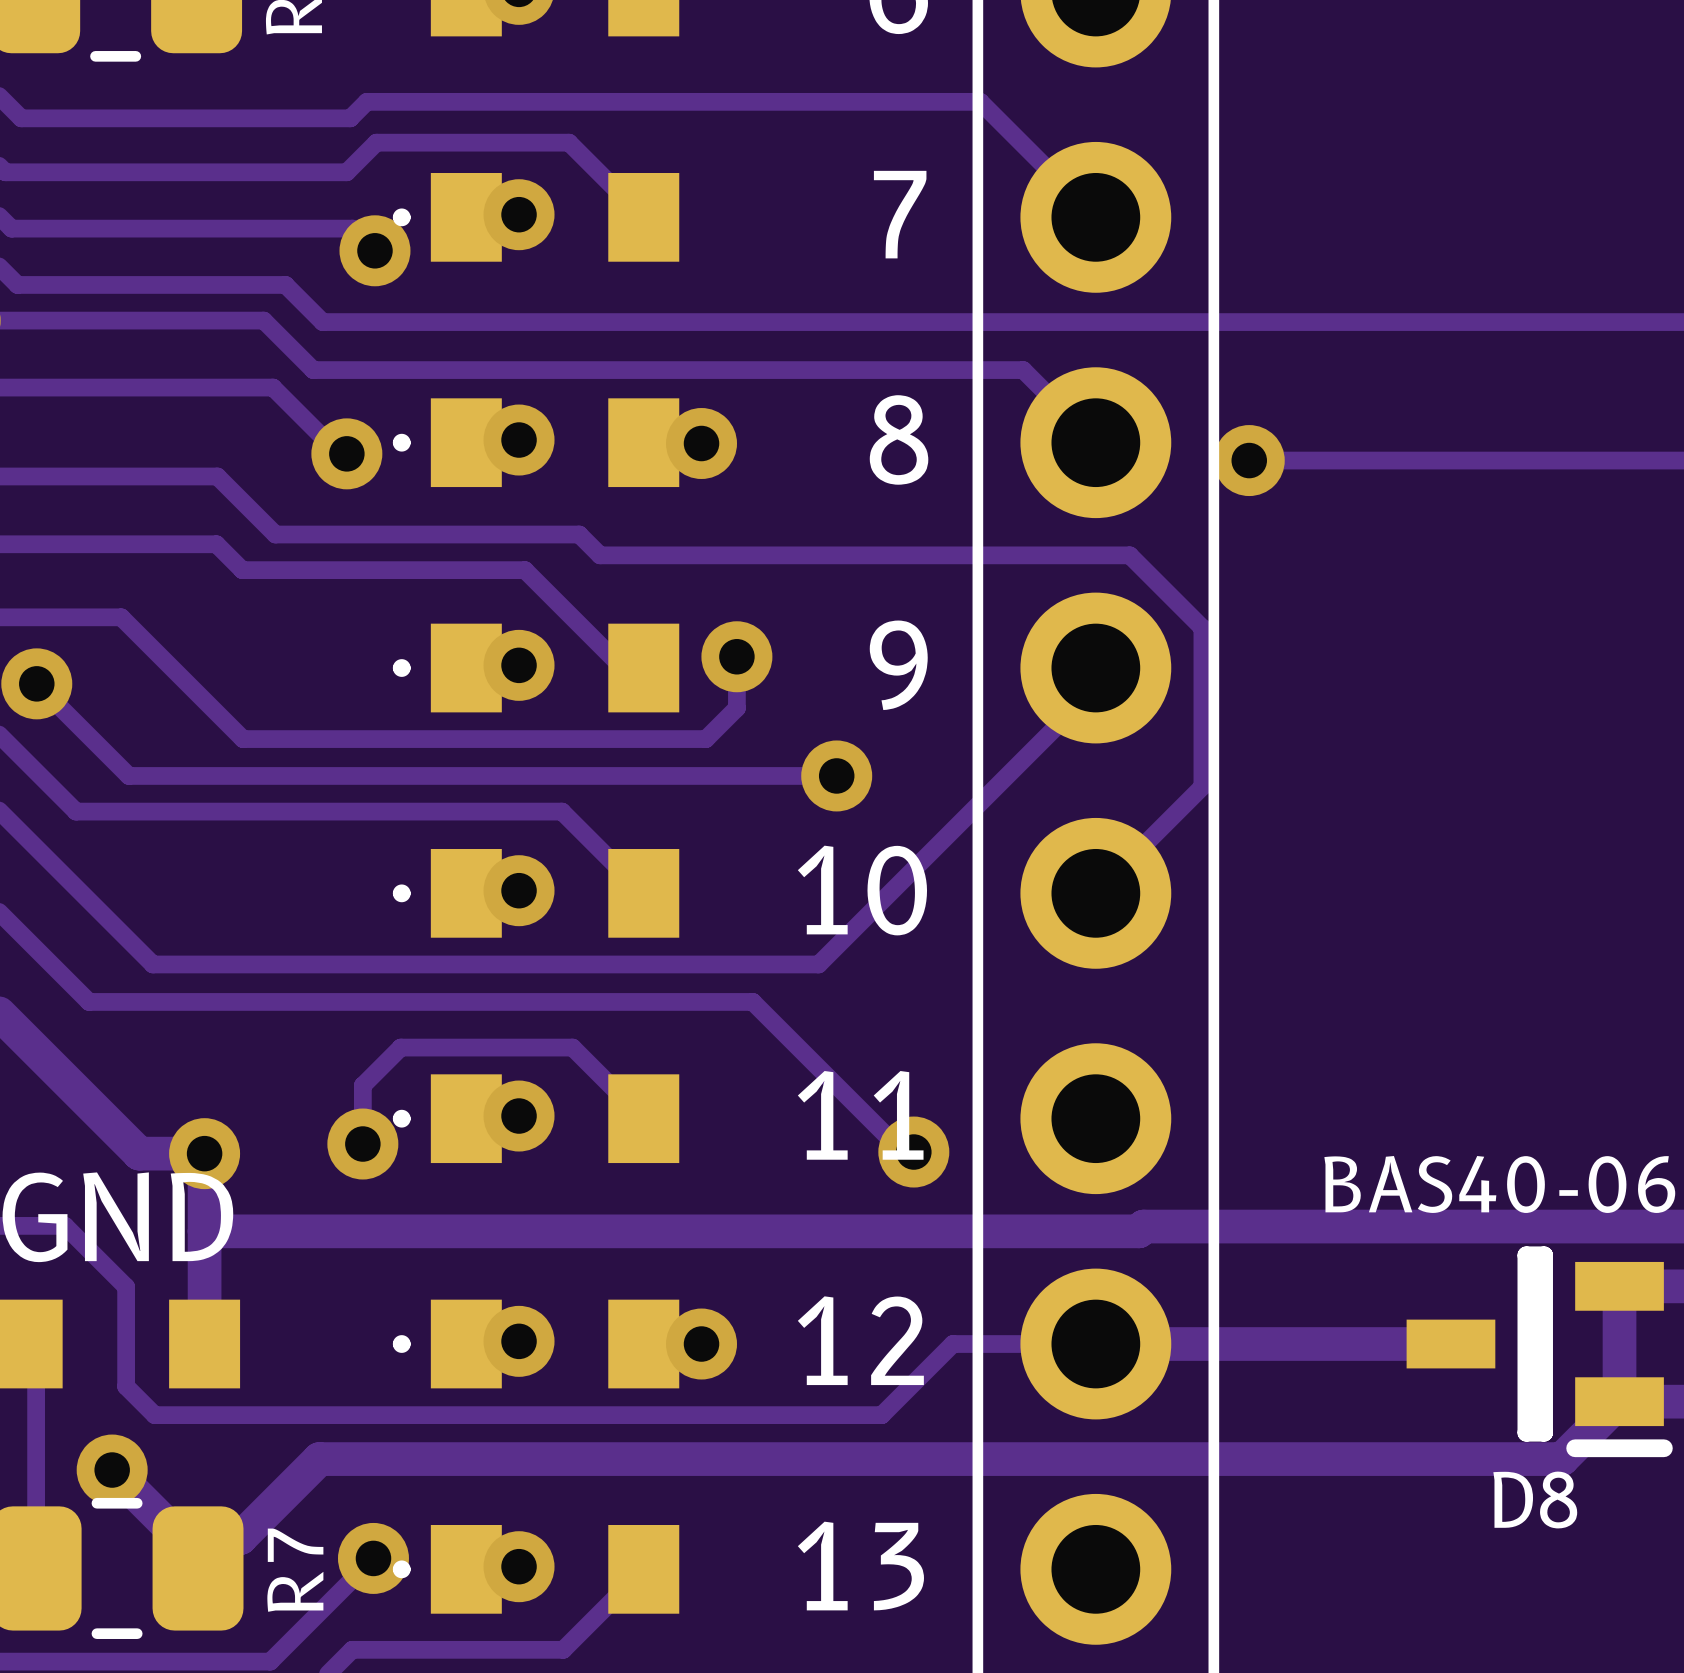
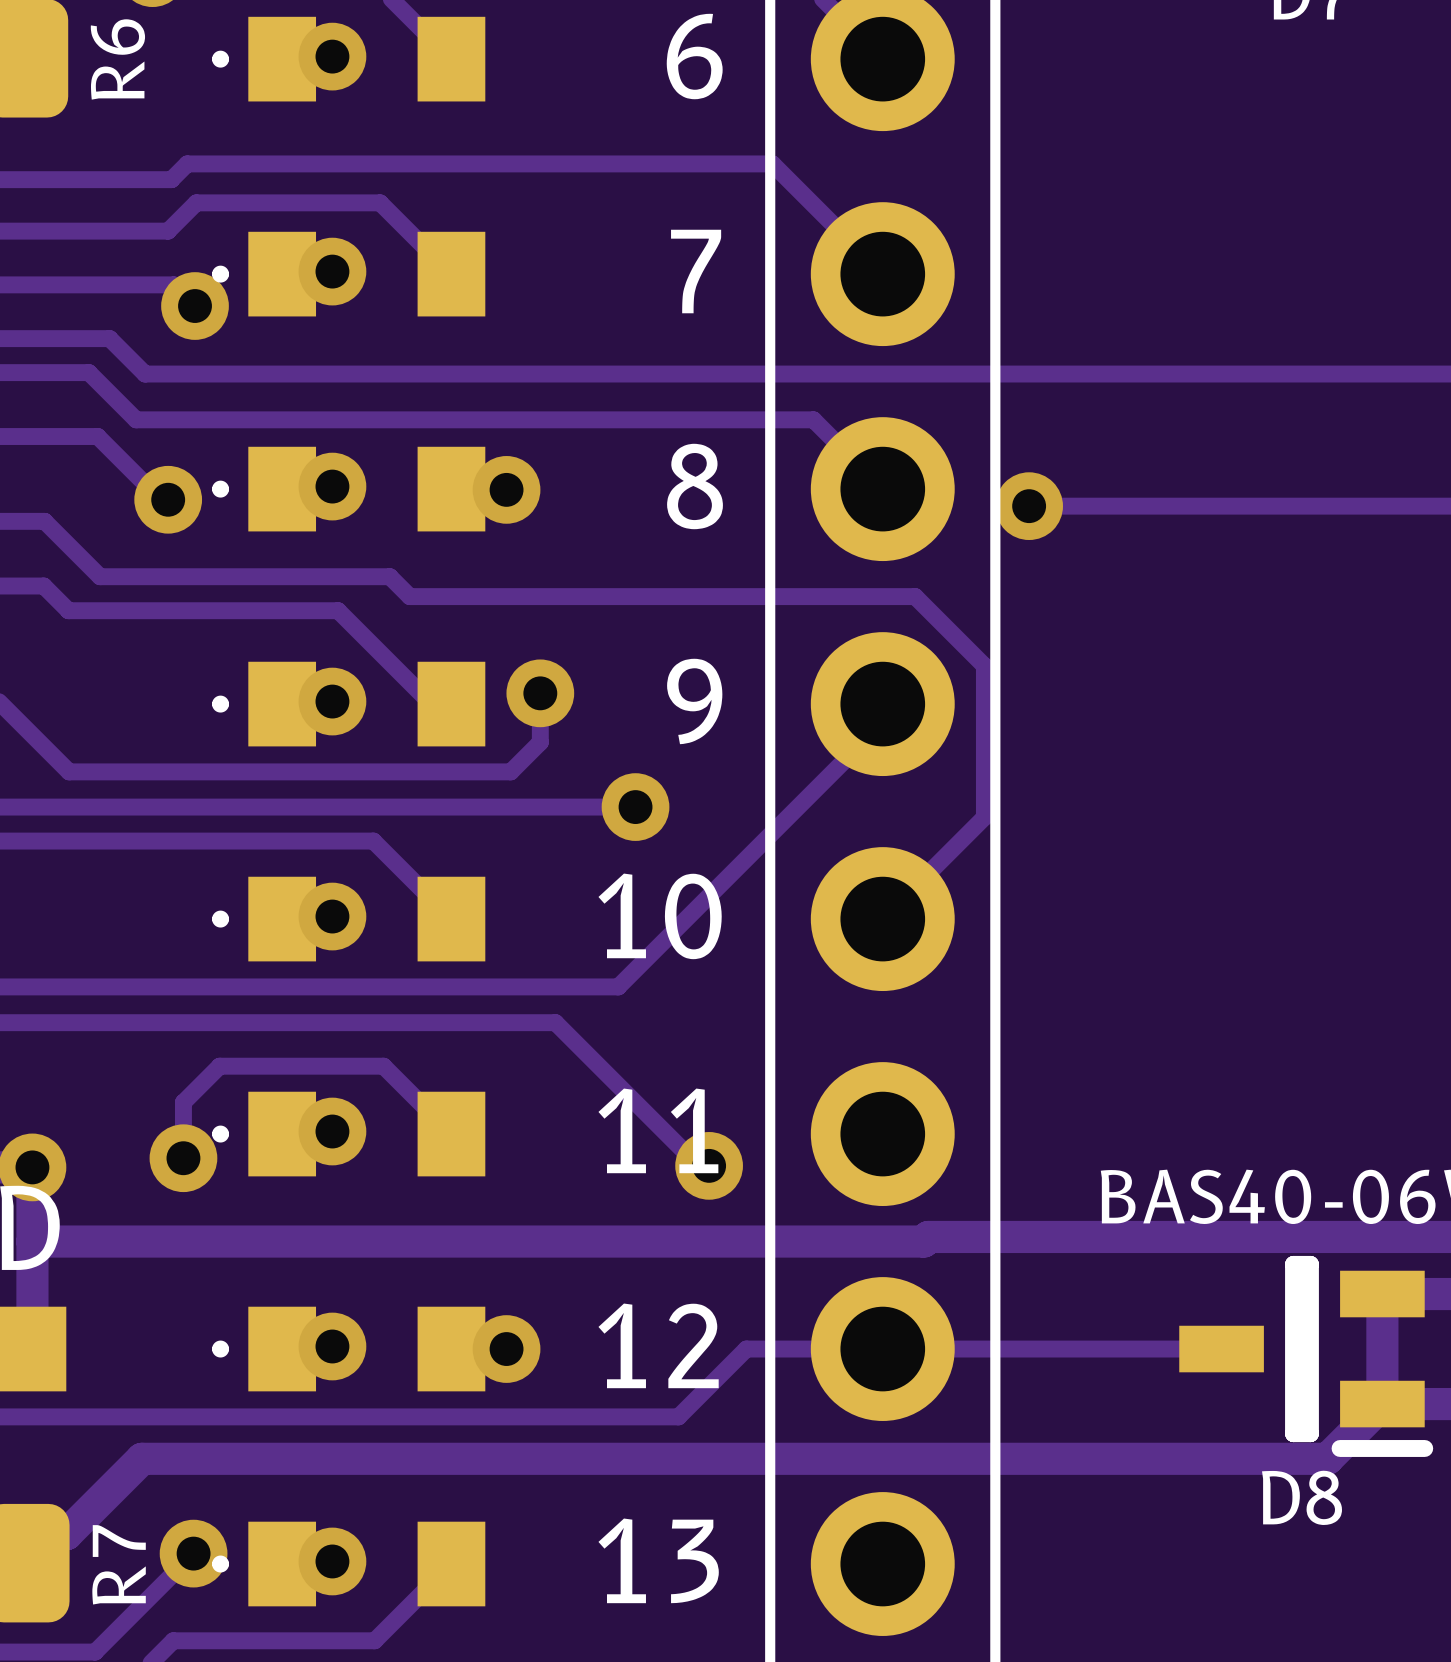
track width: thick (1095, 1344) (1450, 1344) -> thin (882, 1349) (1221, 1349)

